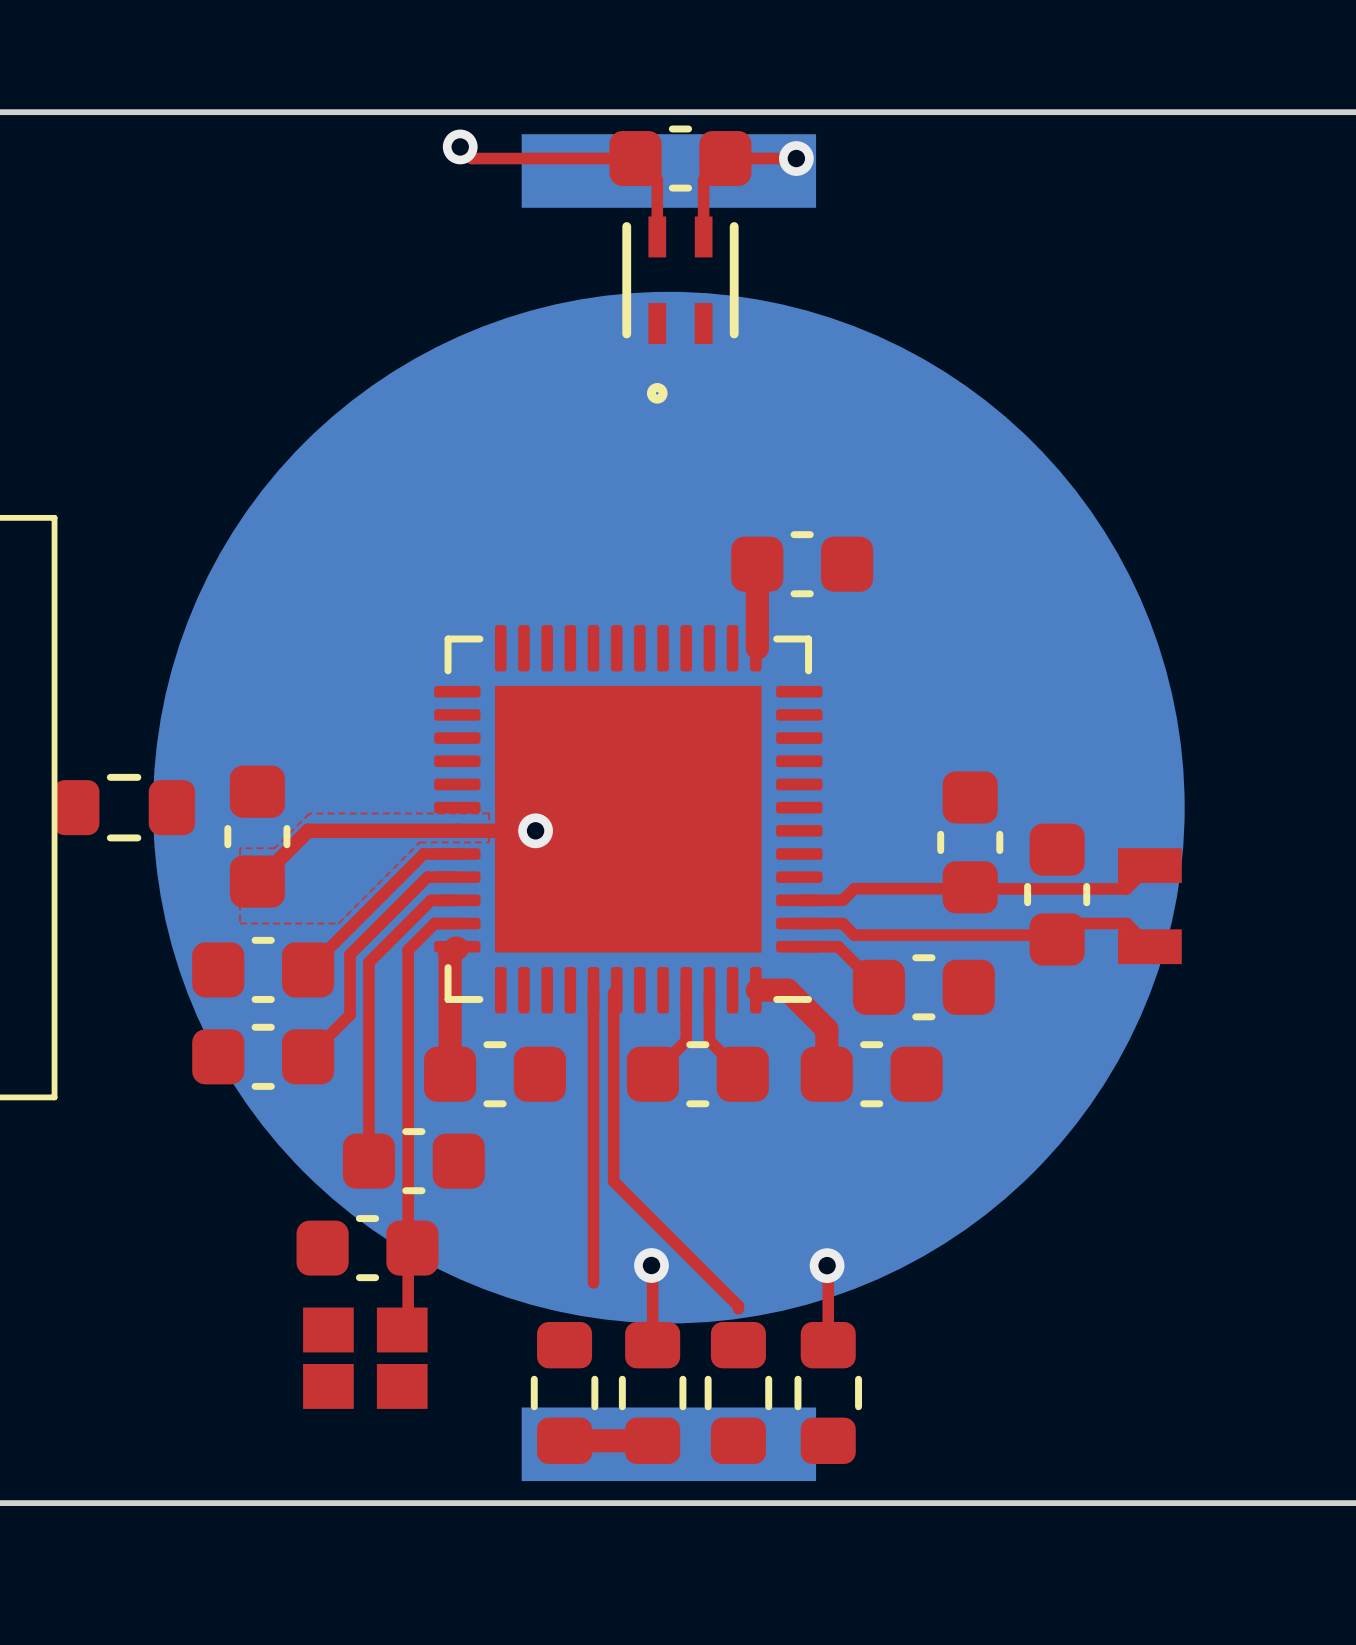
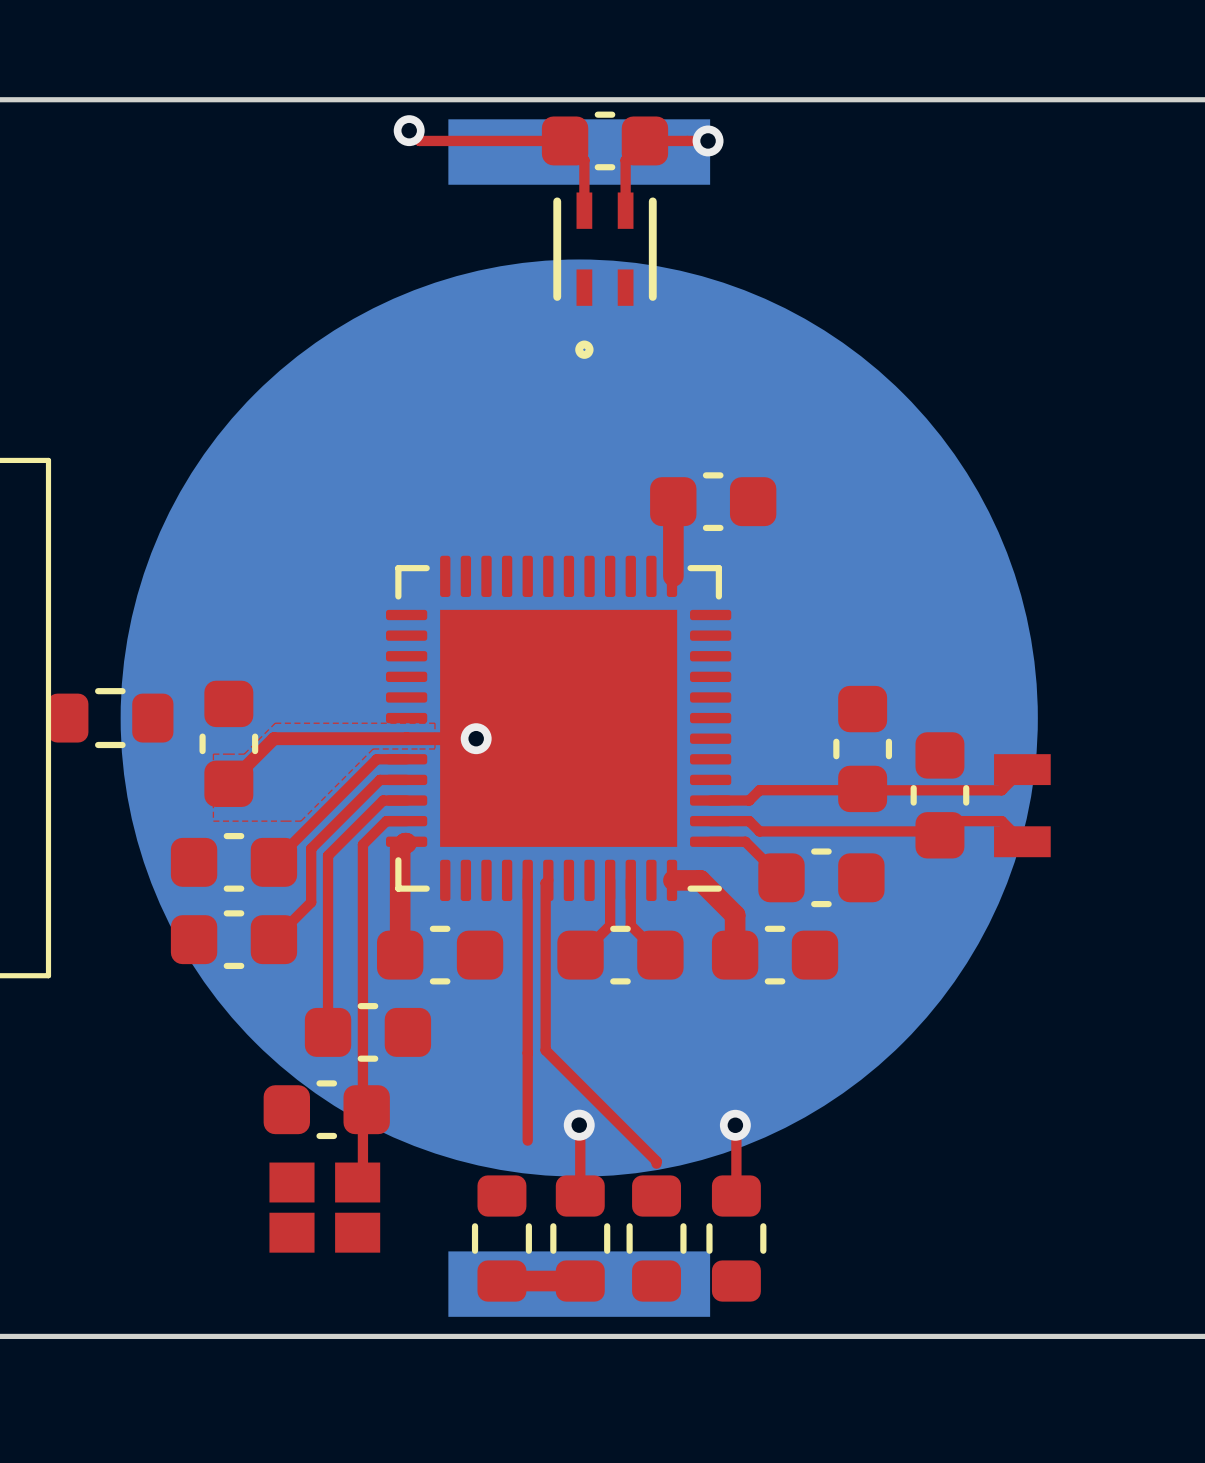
part position: (668, 807) -> (579, 718)

